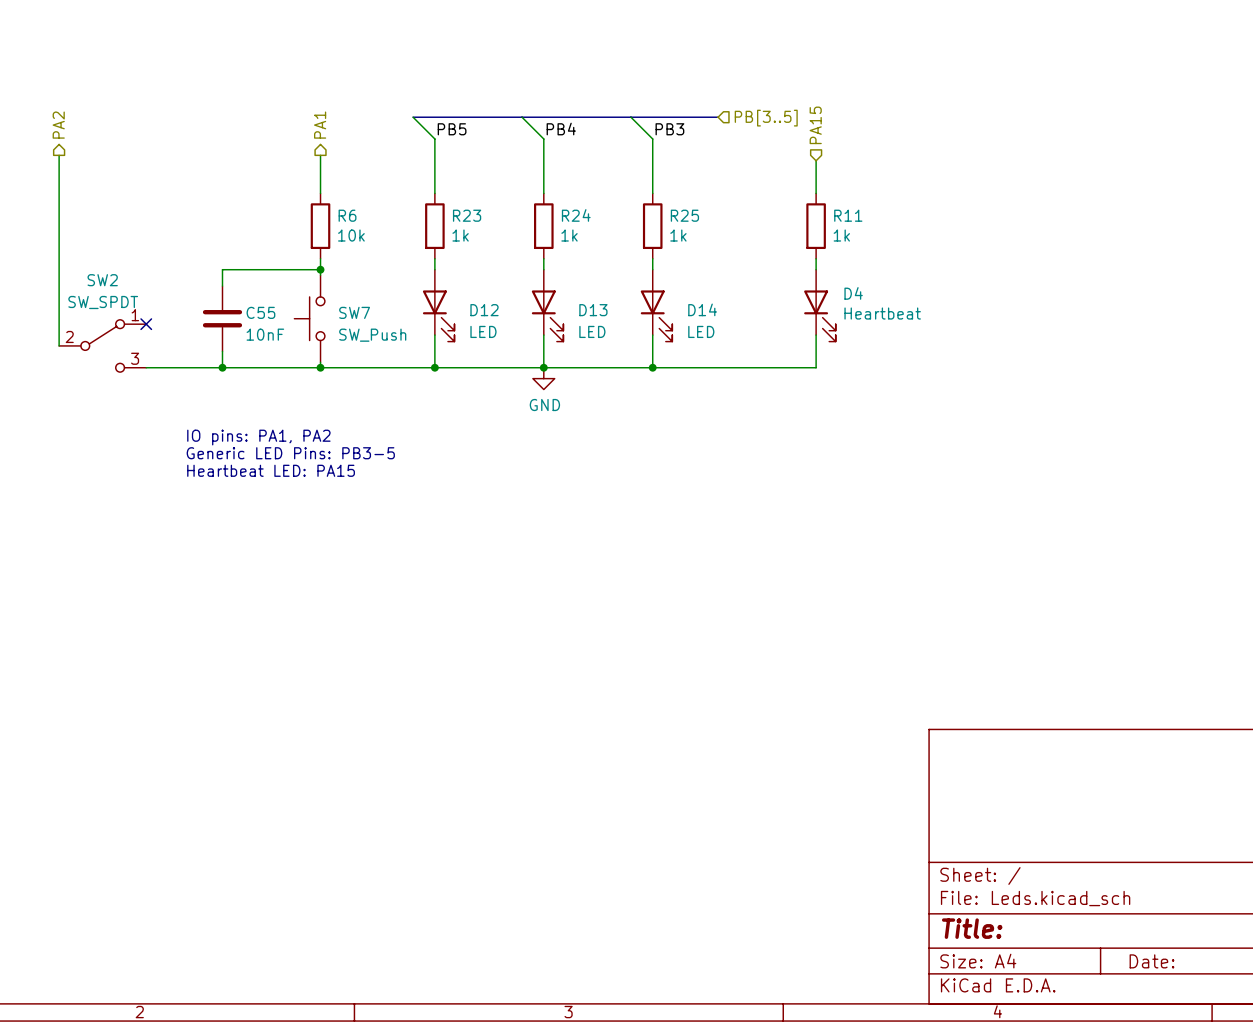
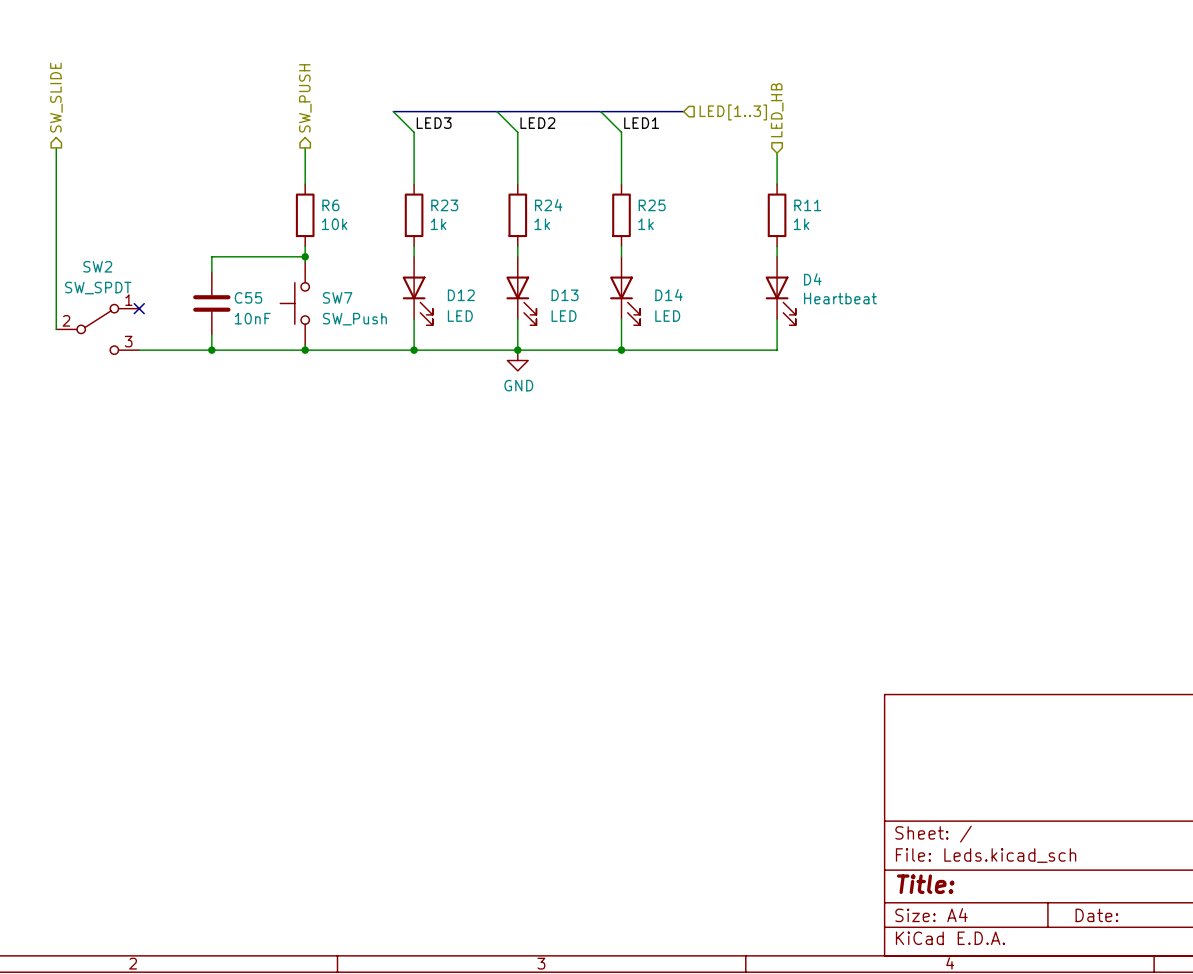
hierarchical label: PB[3..5] (766, 118) -> LED[1..3] (733, 112)
hierarchical label: PA2 (58, 125) -> SW_SLIDE (56, 97)
hierarchical label: PA1 (320, 125) -> SW_PUSH (305, 98)
hierarchical label: PA15 (815, 125) -> LED_HB (777, 110)
label: PB5 (452, 129) -> LED3 (434, 123)
label: PB4 (561, 129) -> LED2 (537, 123)
label: PB3 (669, 129) -> LED1 (641, 123)
text: IO pins: PA1, PA2 (258, 437) -> none
text: Generic LED Pins: PB3-5 (290, 453) -> none
text: Heartbeat LED: PA15 (271, 470) -> none

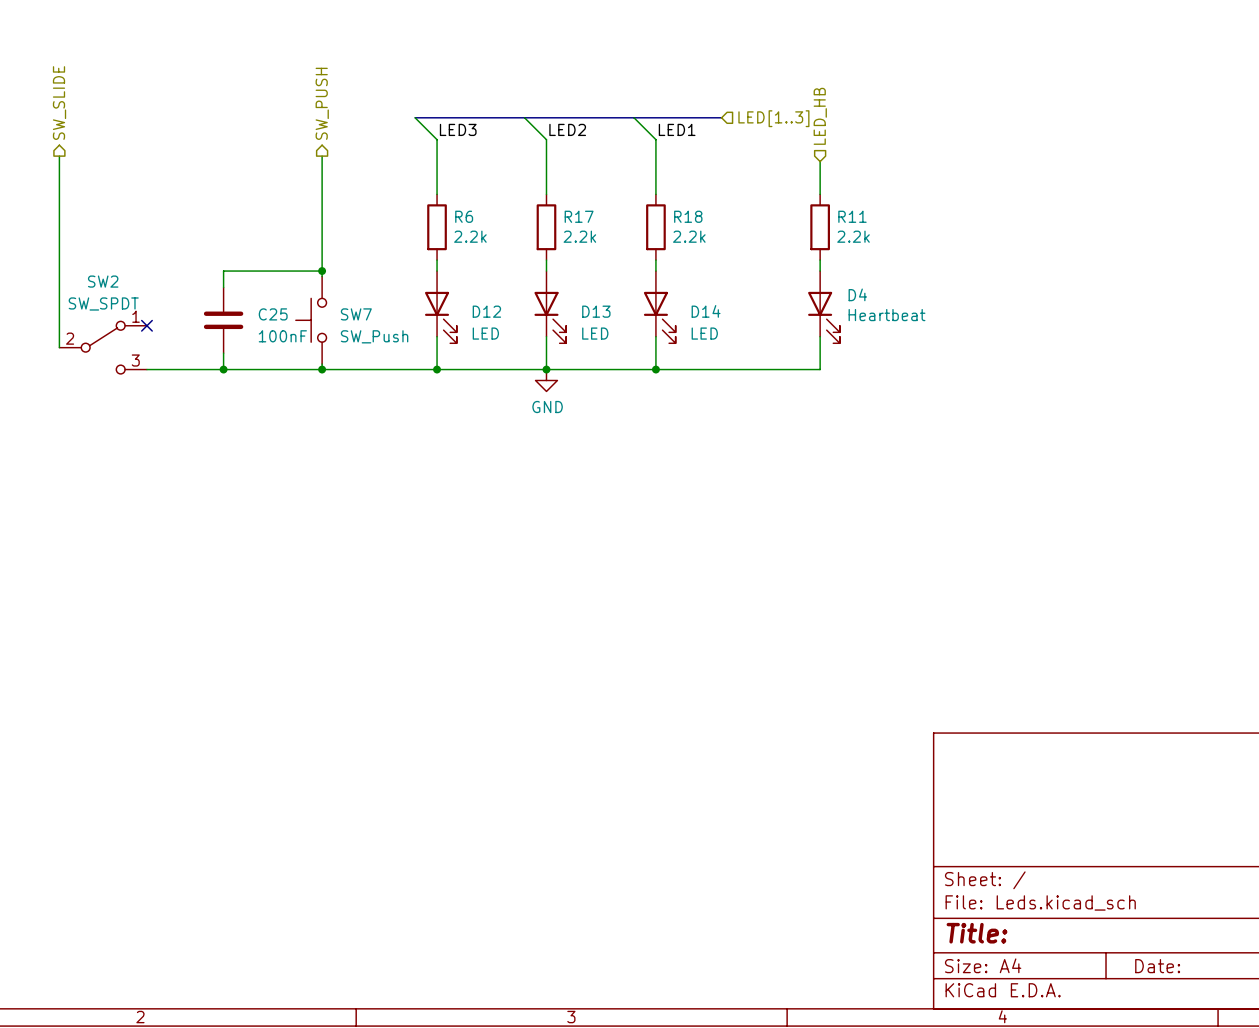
wire: none -> (322, 194) (322, 260)
R23 name: R23 (444, 205) -> R6 (464, 216)
R24 name: R24 (548, 205) -> R17 (579, 216)
R25 name: R25 (652, 205) -> R18 (688, 216)
R6: 10k (305, 215) -> none
R23 value: 1k (438, 224) -> 2.2k (470, 236)
R24 value: 1k (542, 224) -> 2.2k (579, 236)
R25 value: 1k (645, 224) -> 2.2k (689, 236)
R11 value: 1k (801, 224) -> 2.2k (853, 236)
C55 name: C55 (248, 297) -> C25 (273, 314)
C55 value: 10nF (252, 318) -> 100nF (282, 336)

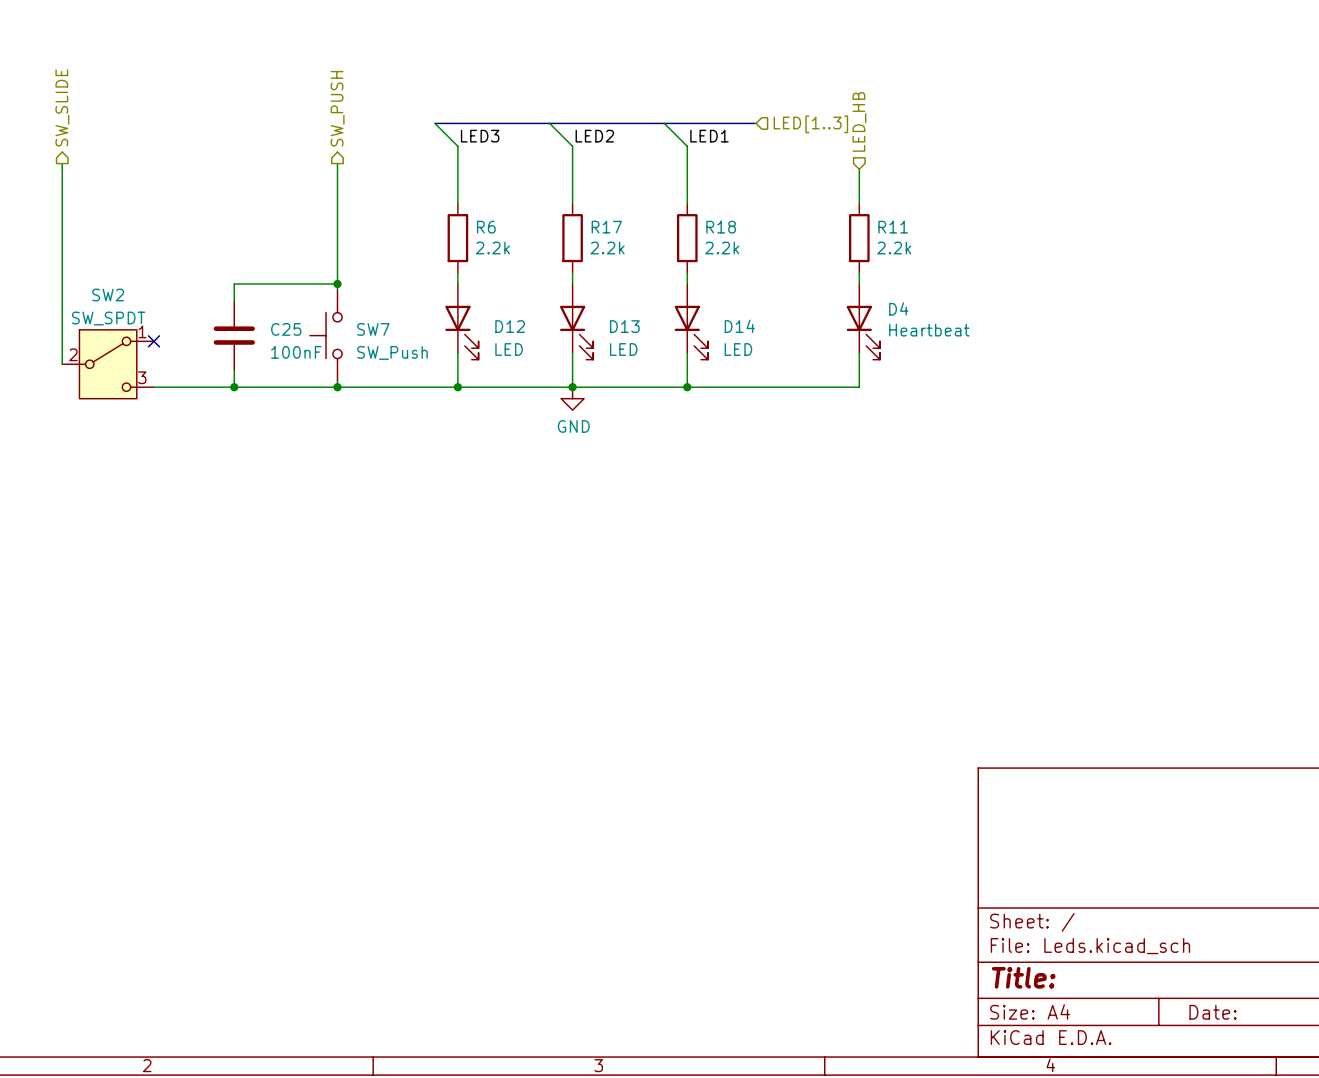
SW2 symbol: [59, 321, 147, 374] -> [62, 329, 154, 399]

